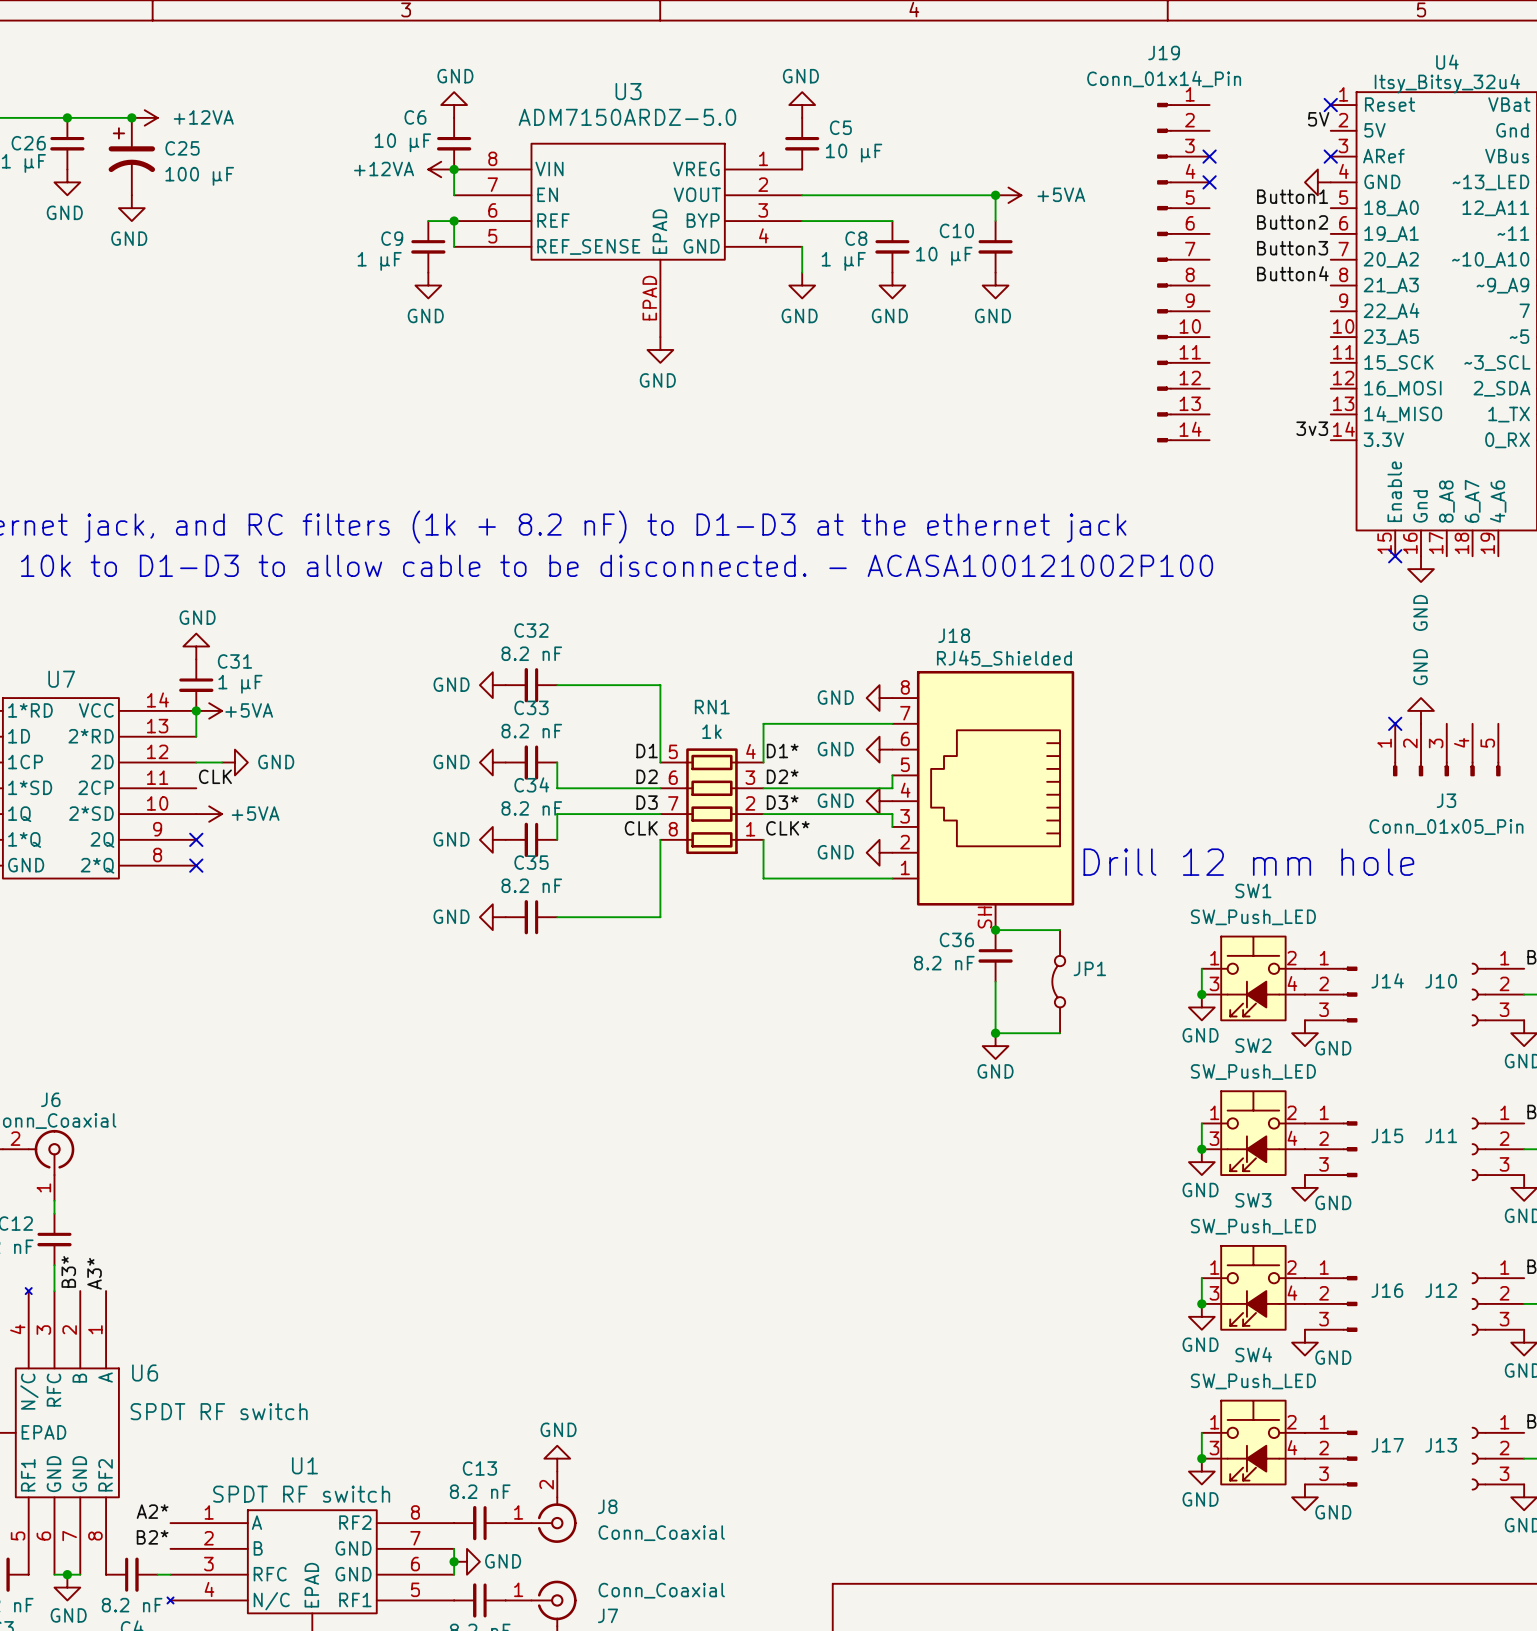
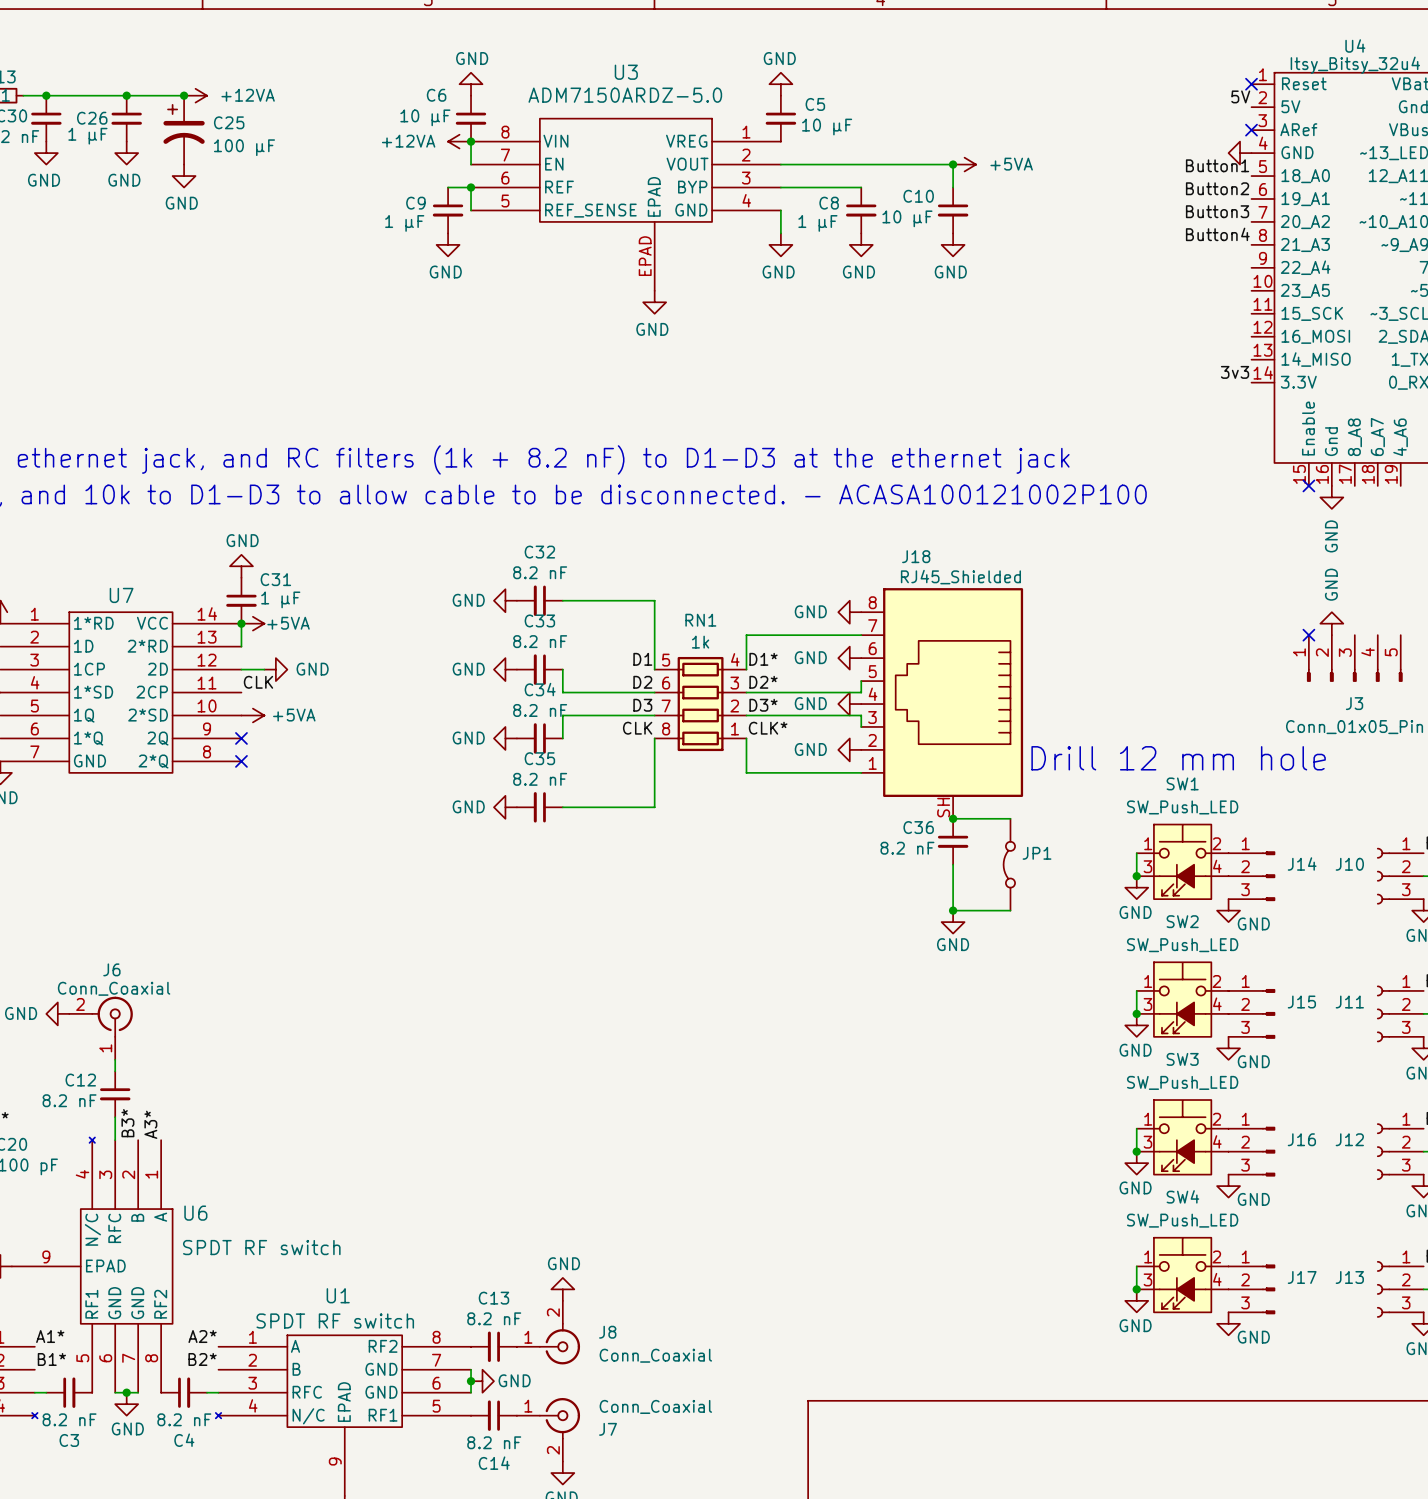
no-connect mark: (1209, 156) -> none
no-connect mark: (1209, 182) -> none
J19: Conn_01x14_Pin (1183, 272) -> none

